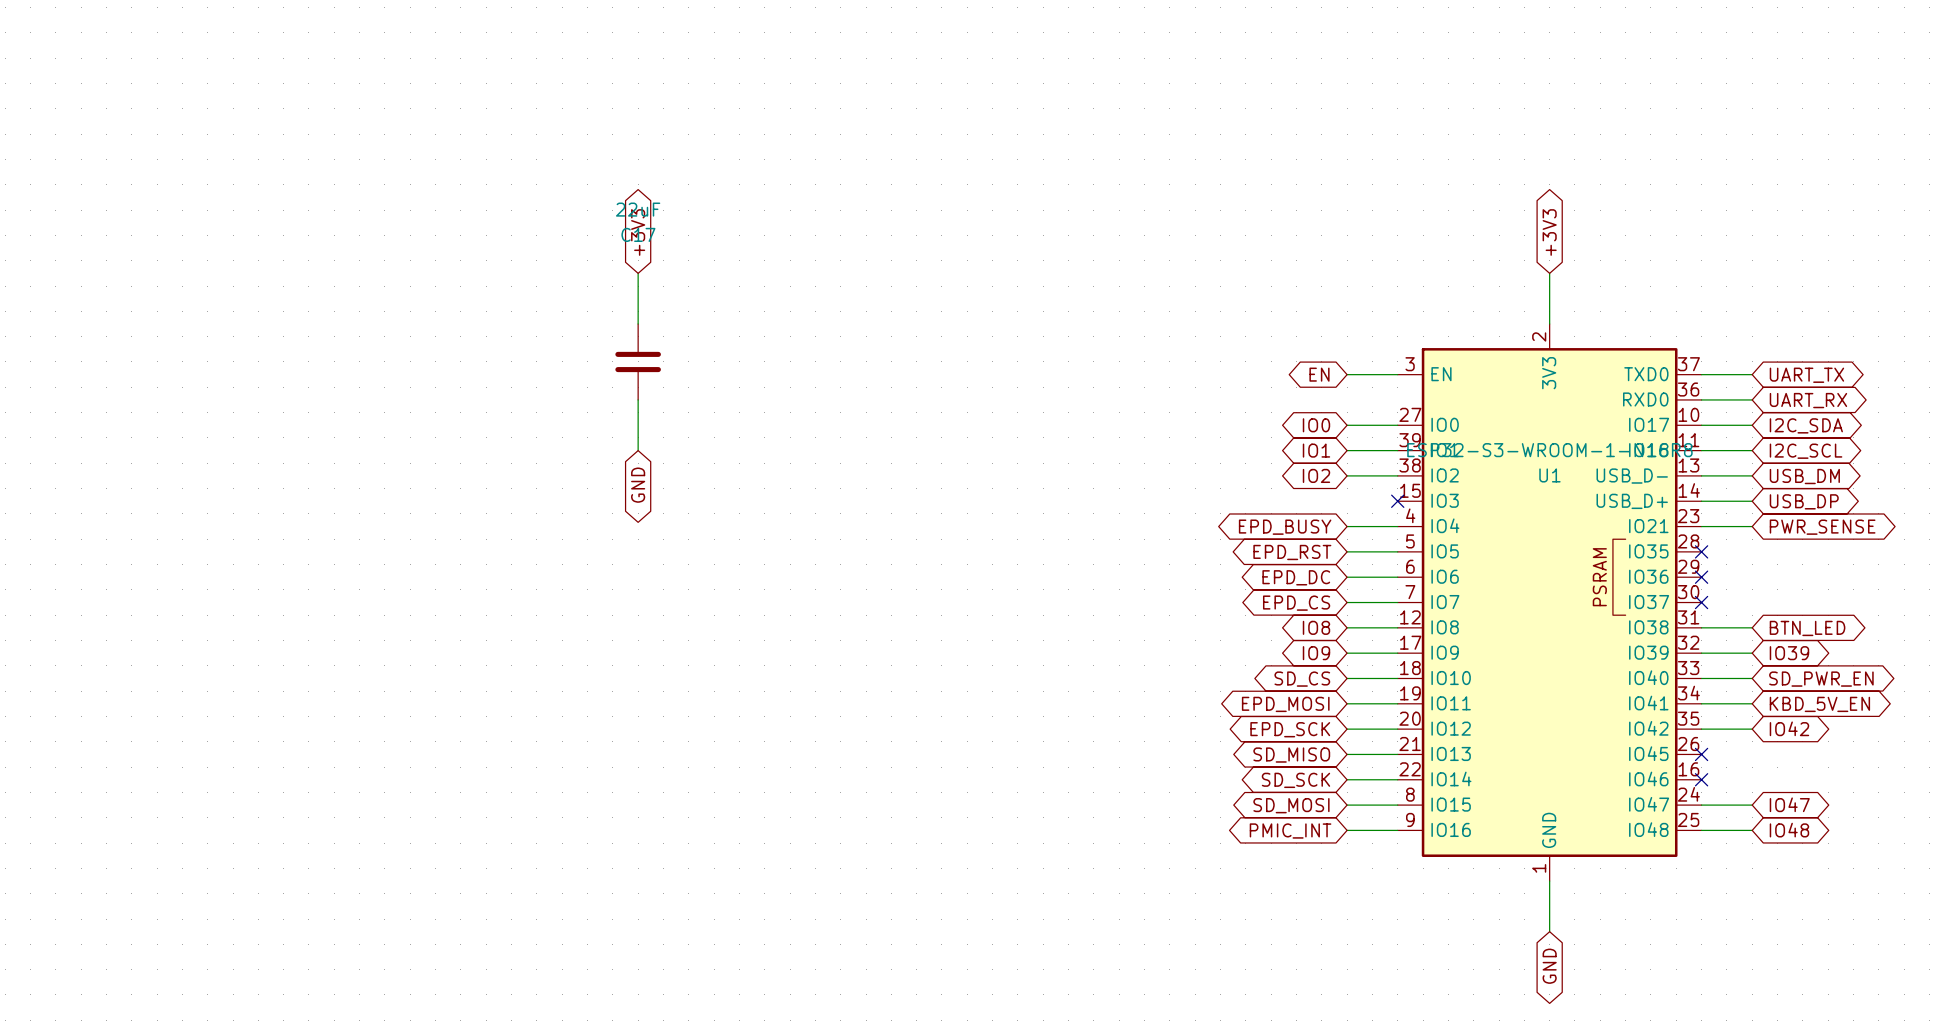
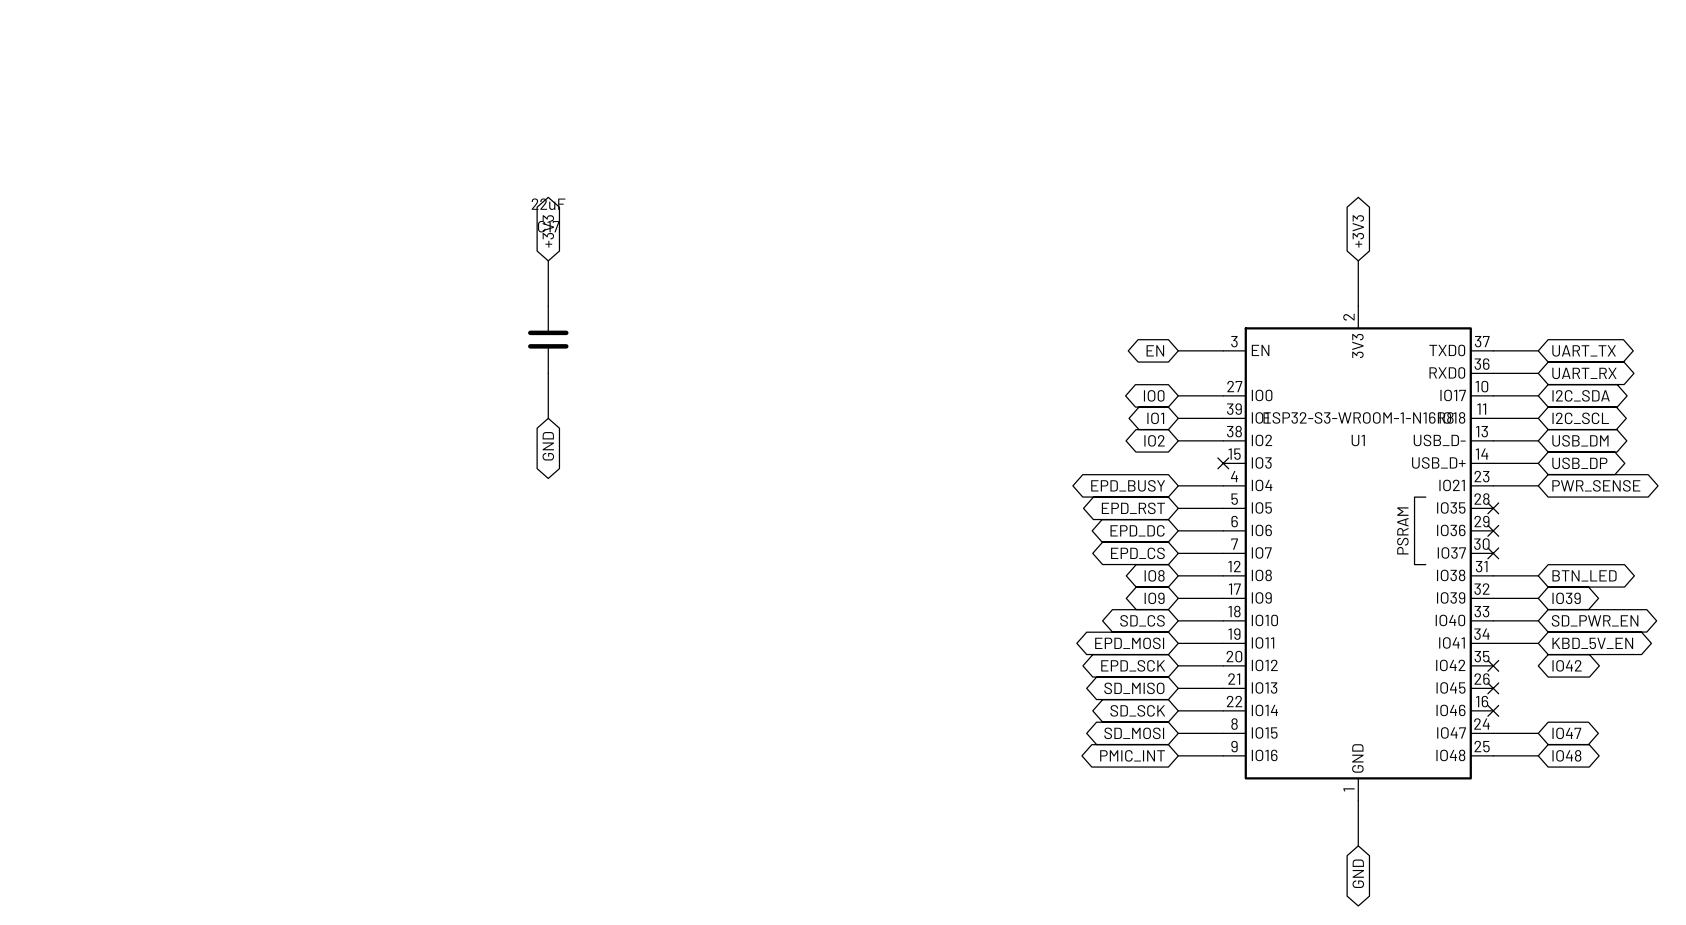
wire: (1701, 729) (1752, 729) -> none
no-connect mark: none -> (1493, 665)

